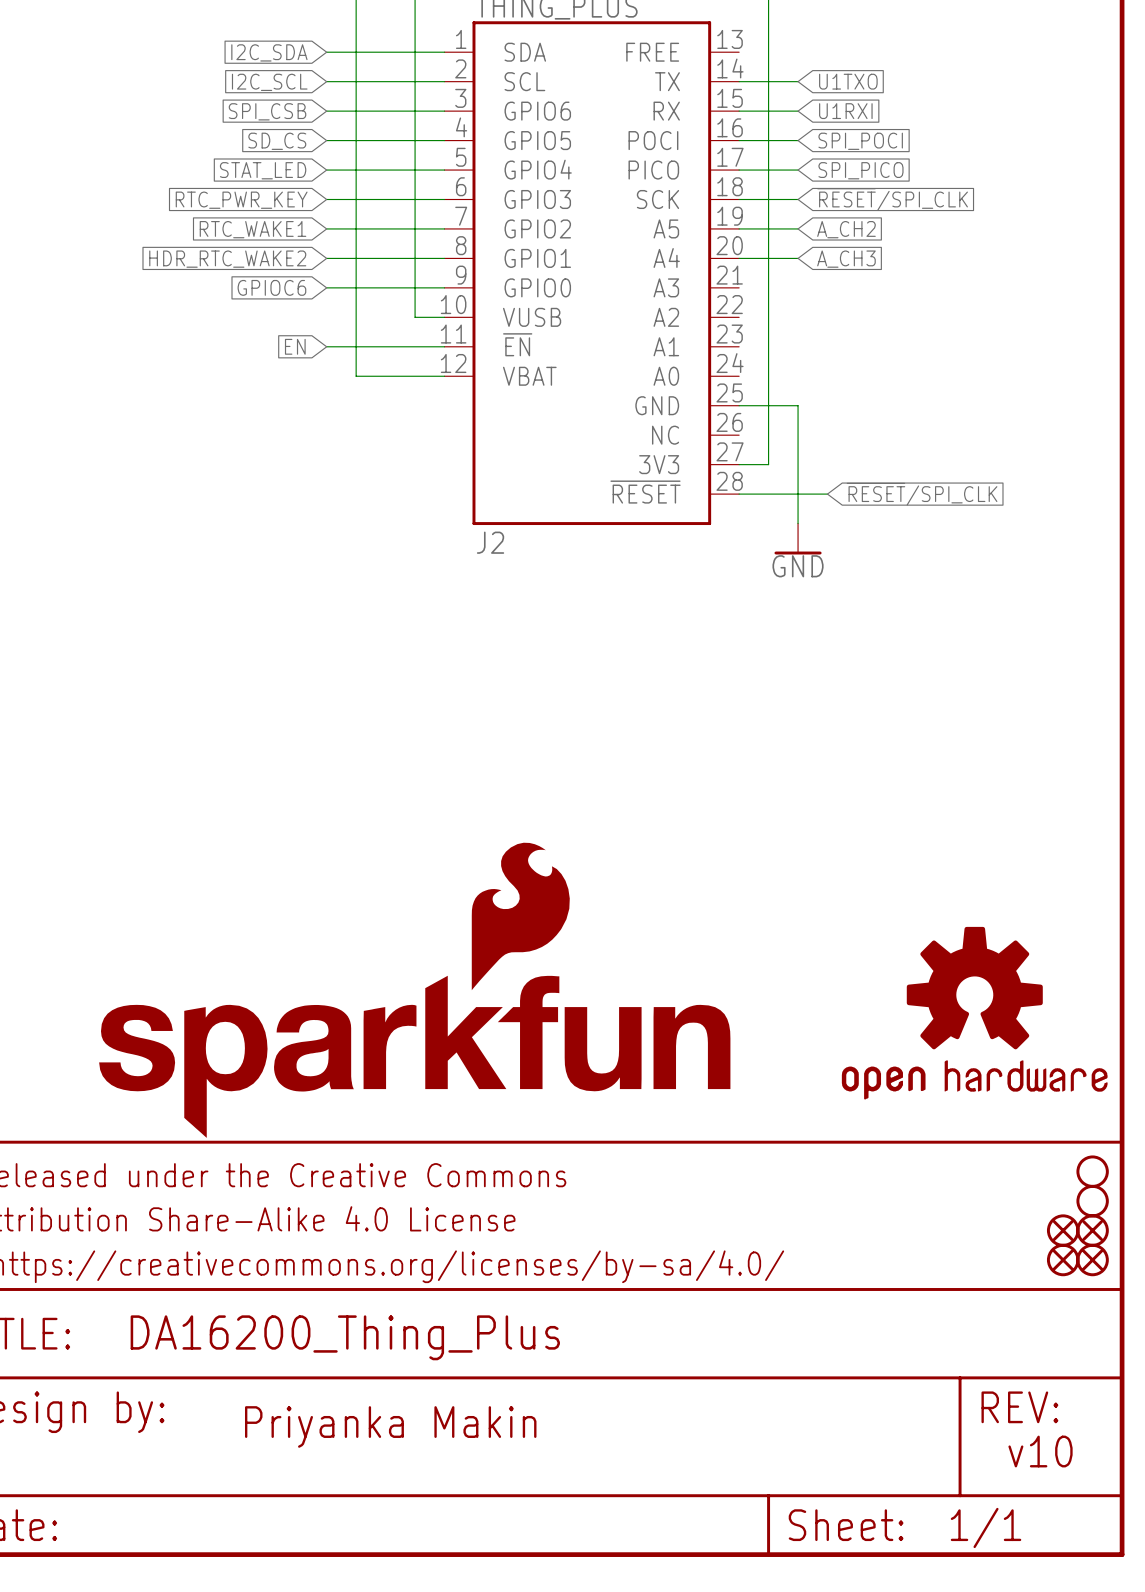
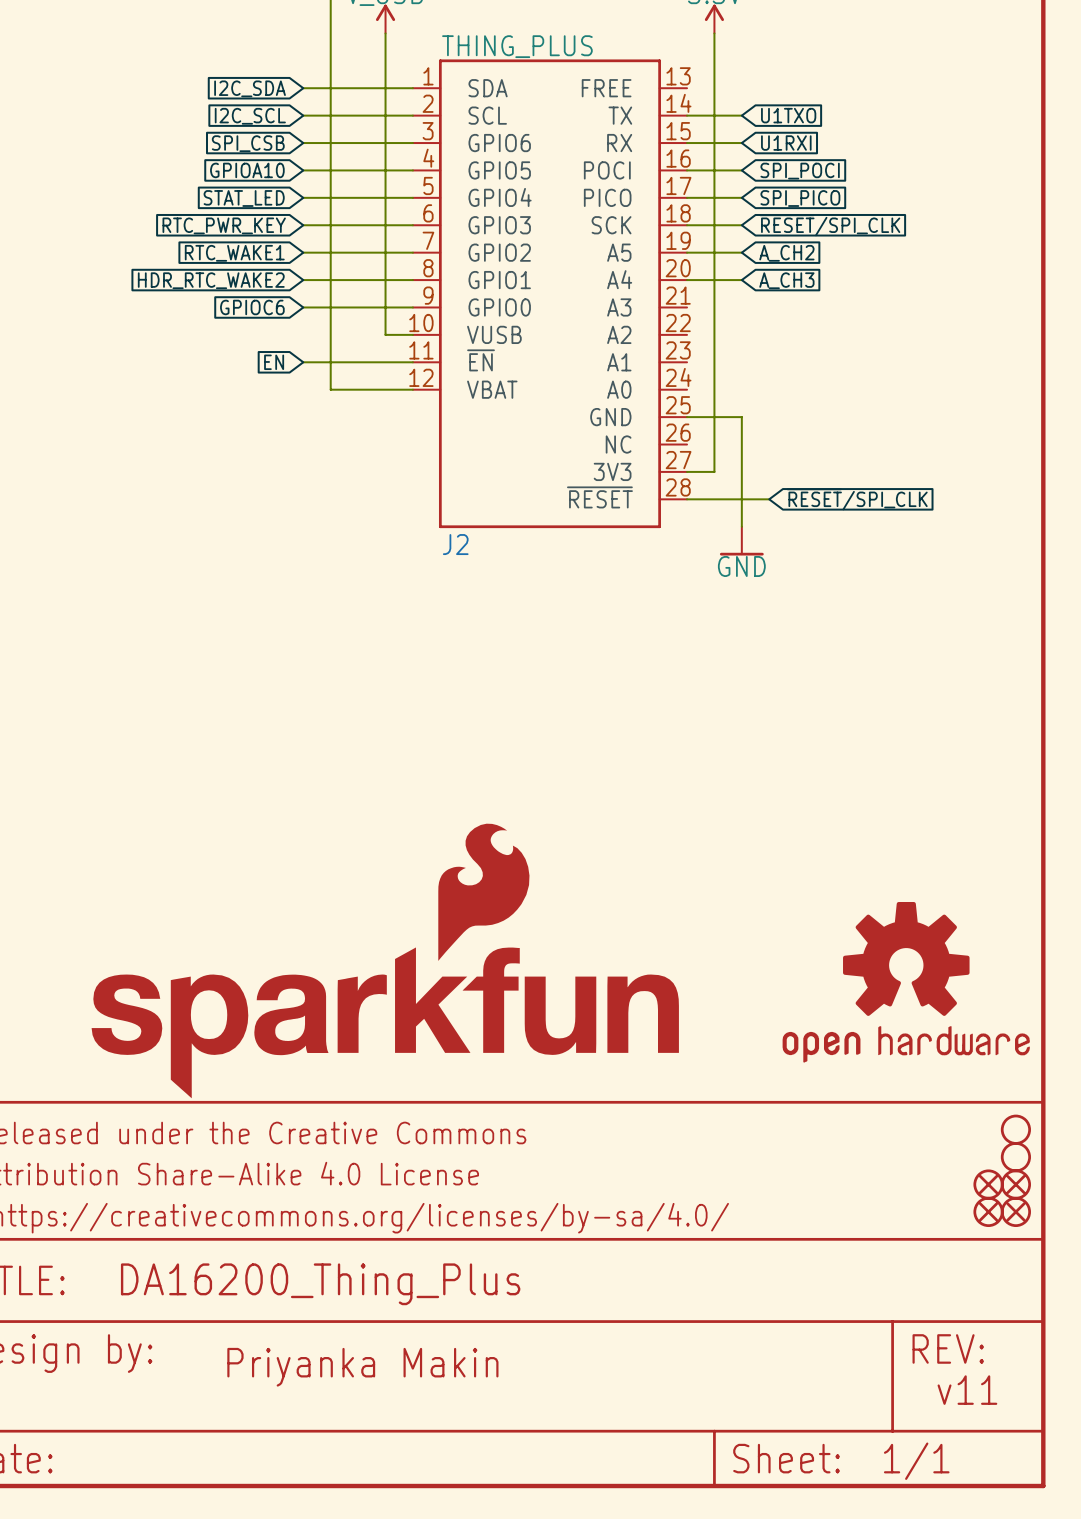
global label: SD_CS (277, 141) -> GPIOA10 (247, 170)
text: v10 (1040, 1451) -> v11 (967, 1390)

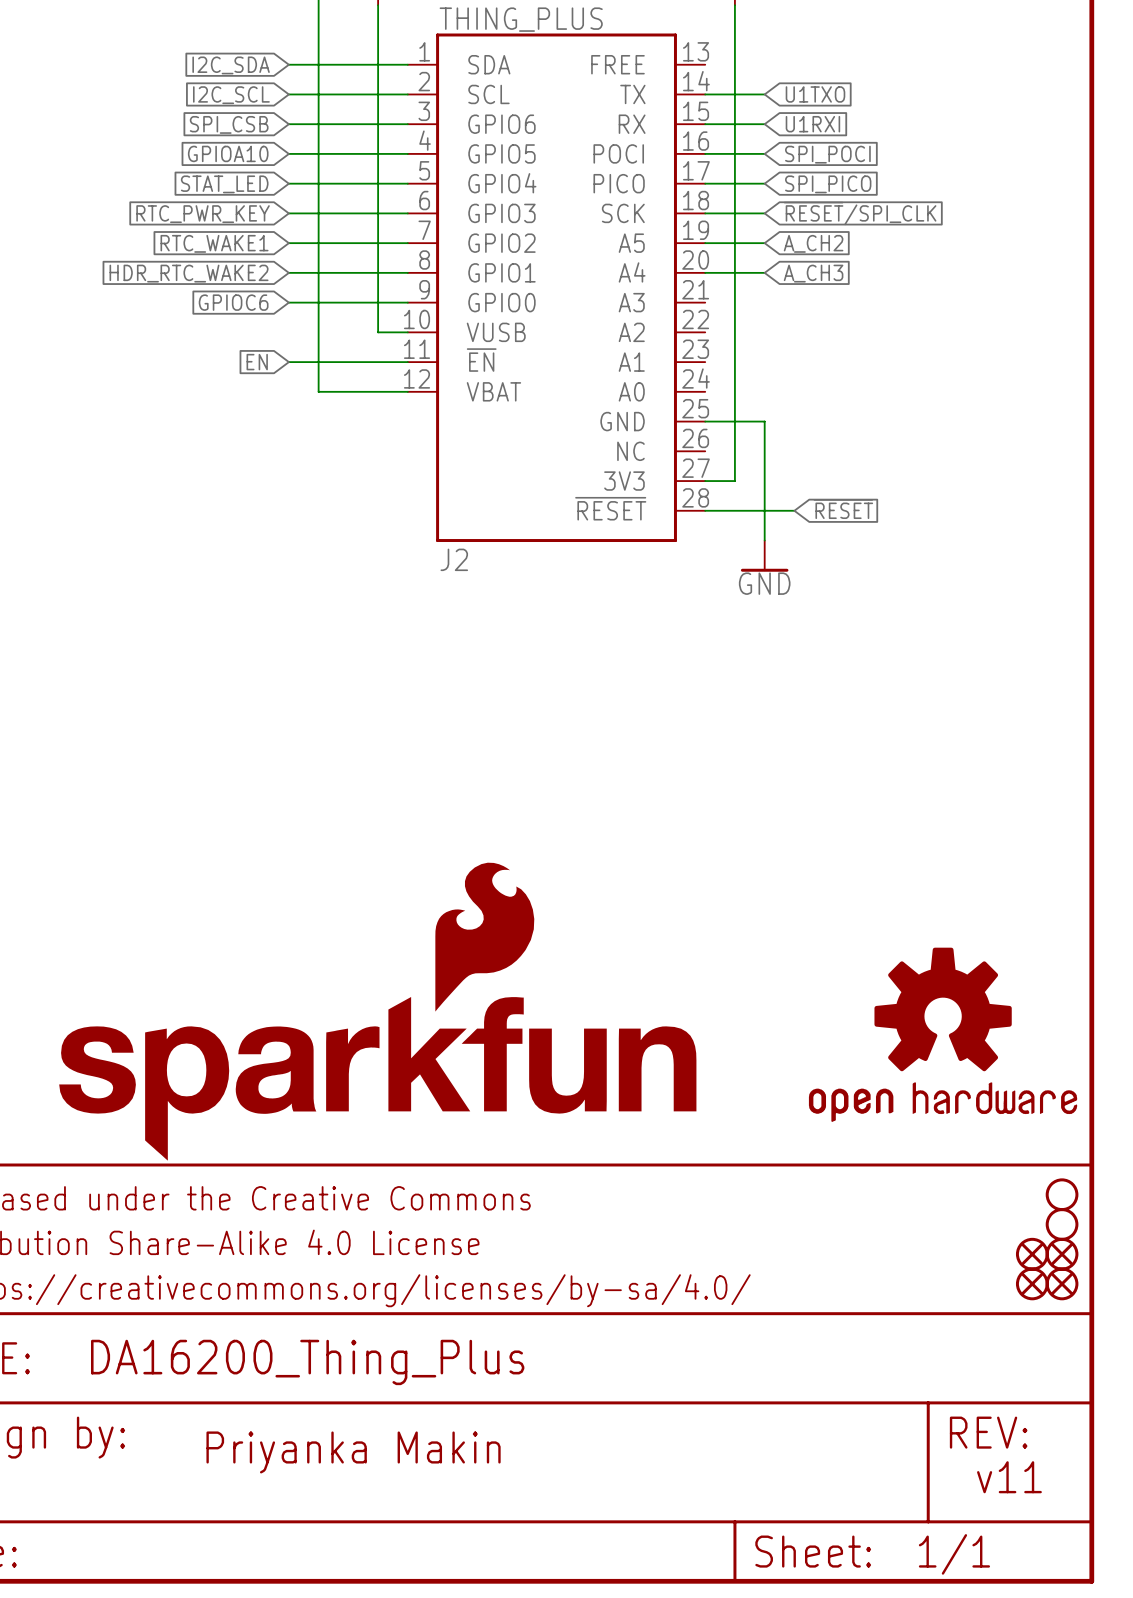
global label: ~{RESET}/SPI_CLK (857, 499) -> ~{RESET} (843, 509)

